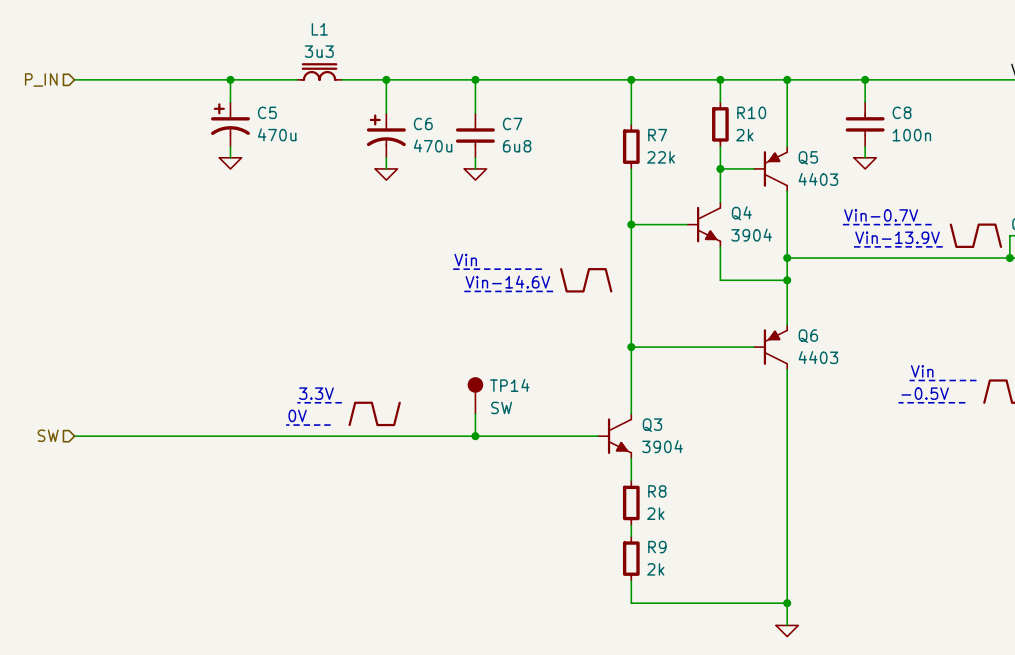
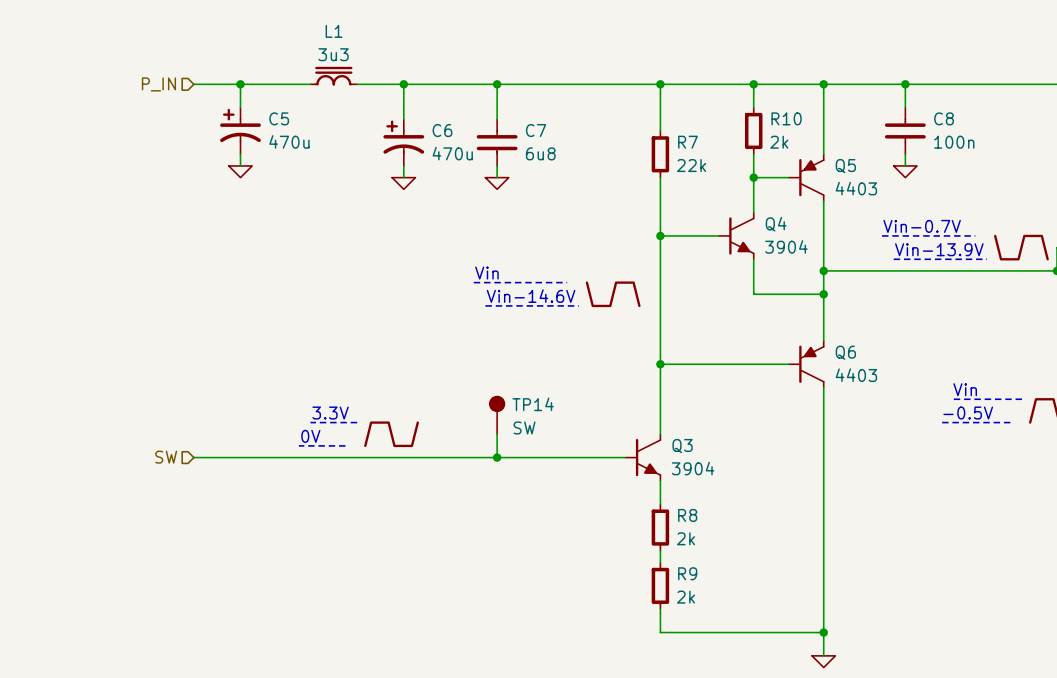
hierarchical label position: P_IN (41, 79) -> P_IN (158, 84)
wire: (74, 79) (185, 79) -> none
hierarchical label position: SW (48, 435) -> SW (166, 457)
wire: (74, 436) (185, 436) -> none

